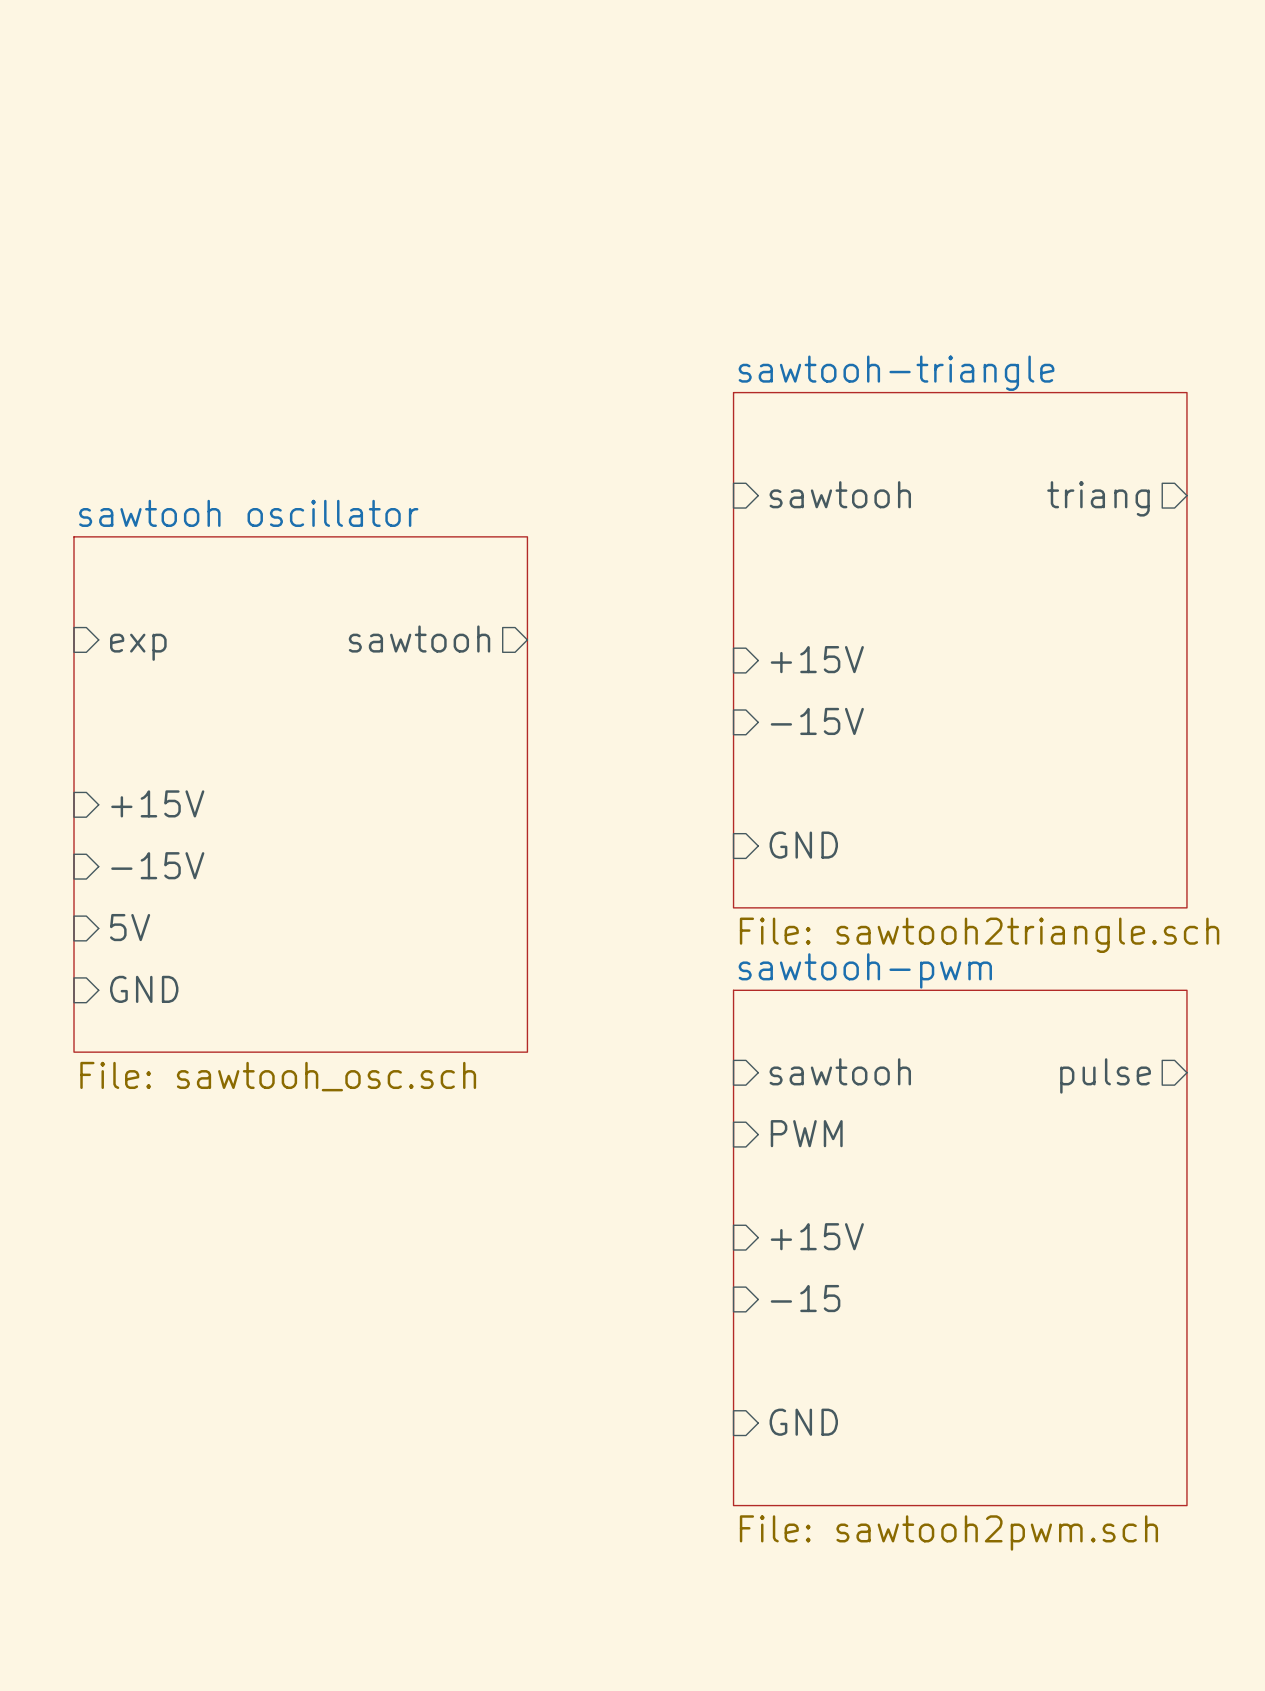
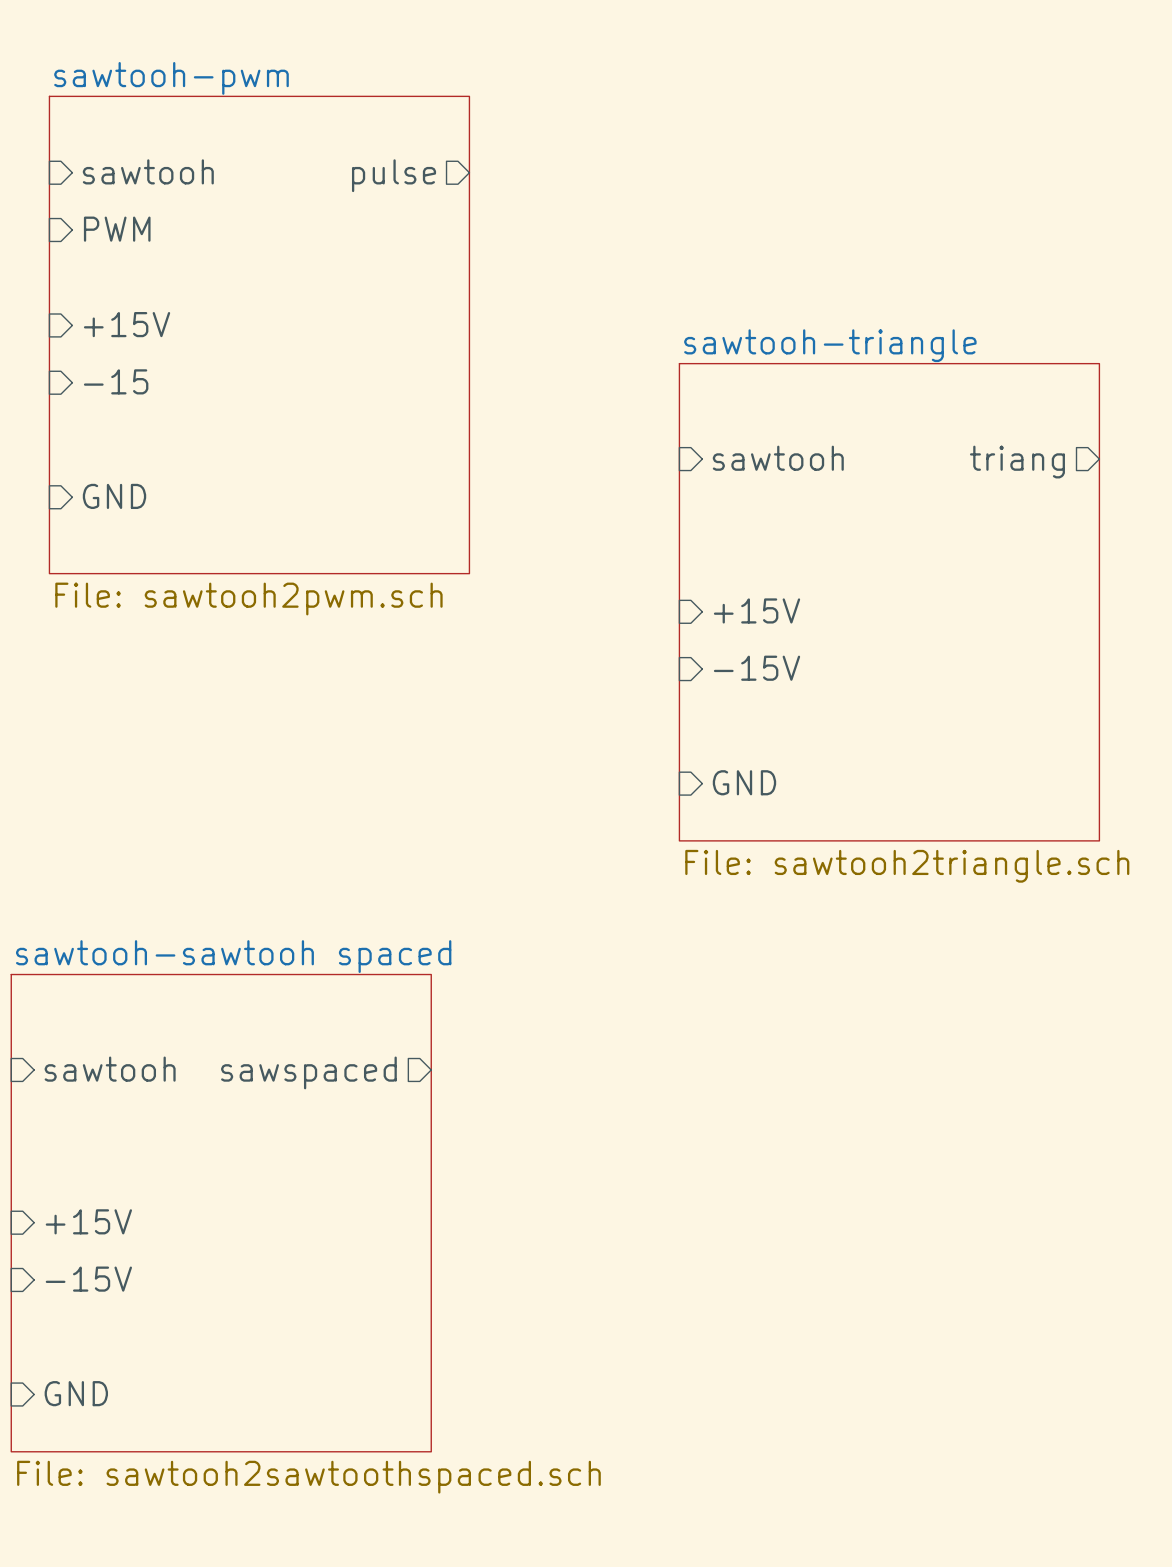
sheet pin: none -> sawtooh (148, 171)
sheet pin: none -> pulse (394, 175)
sheet pin: none -> PWM (117, 229)
sheet pin: none -> +15V (127, 324)
sheet sawtooh-pwm: none -> File: sawtooh2pwm.sch (259, 335)
sheet pin: none -> -15 (116, 381)
sheet pin: none -> GND (114, 496)
sheet pin: sawtooh (419, 639) -> none
sheet pin: exp (138, 647) -> none
sheet sawtooh oscillator: File: sawtooh_osc.sch (300, 794) -> none
sheet pin: +15V (157, 803) -> none
sheet pin: -15V (157, 865) -> none
sheet pin: 5V (130, 927) -> none
sheet pin: GND (144, 989) -> none
sheet pin: sawtooh (840, 1071) -> none
sheet pin: pulse (1105, 1075) -> none
sheet pin: PWM (806, 1133) -> none
sheet pin: none -> sawtooh (110, 1069)
sheet pin: none -> sawspaced (308, 1072)
sheet pin: +15V (817, 1236) -> none
sheet sawtooh-pwm: File: sawtooh2pwm.sch (960, 1247) -> none
sheet pin: -15 (805, 1298) -> none
sheet sawtooh-sawtooh spaced: none -> File: sawtooh2sawtoothspaced.sch (221, 1213)
sheet pin: none -> +15V (88, 1221)
sheet pin: none -> -15V (88, 1279)
sheet pin: GND (803, 1422) -> none
sheet pin: none -> GND (76, 1393)

